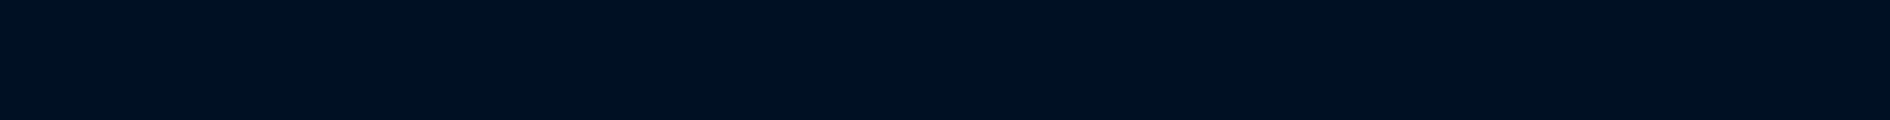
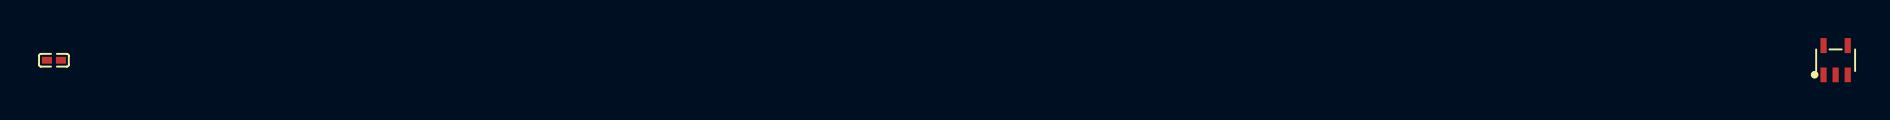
part: none -> (53, 60)
part: none -> (1833, 60)

